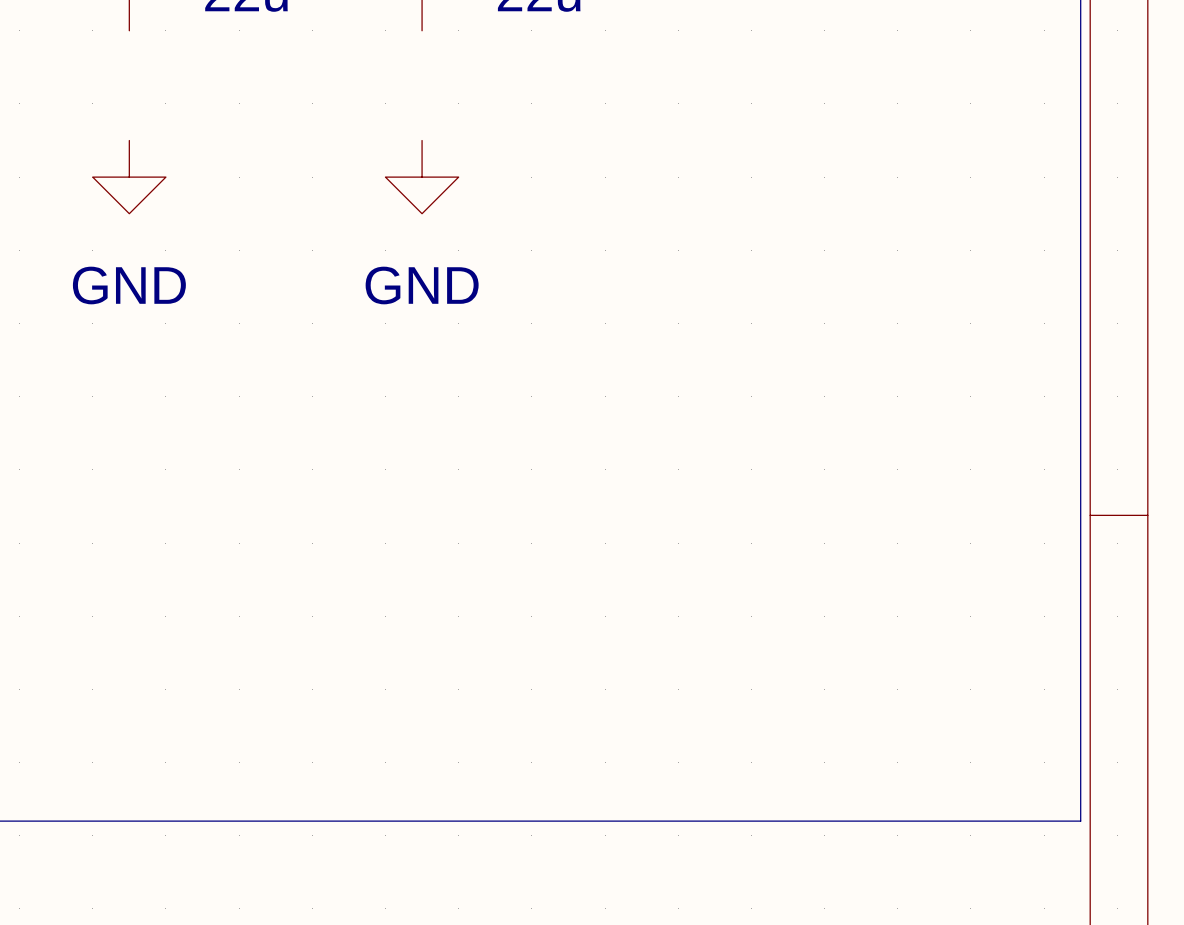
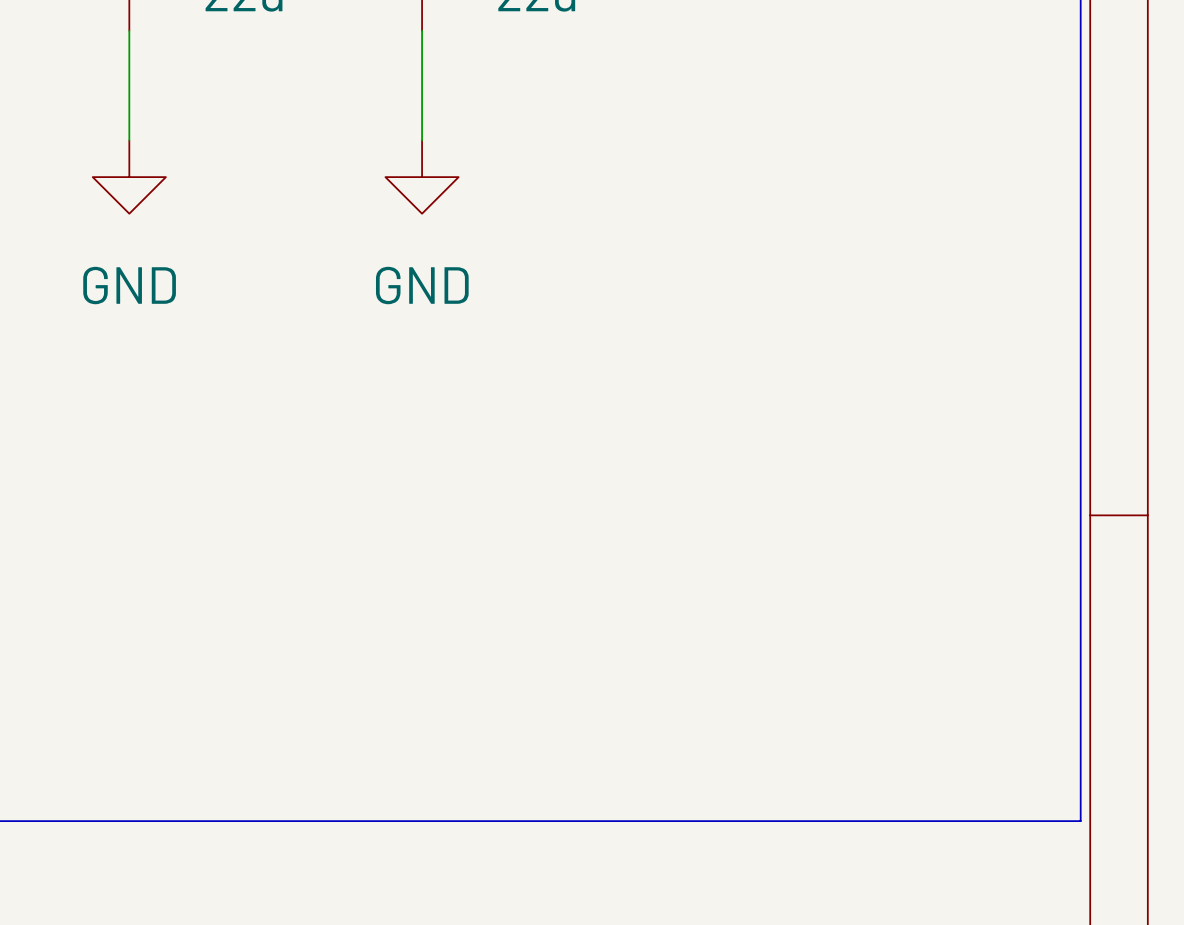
wire: none -> (129, 30) (129, 140)
wire: none -> (422, 30) (422, 140)

